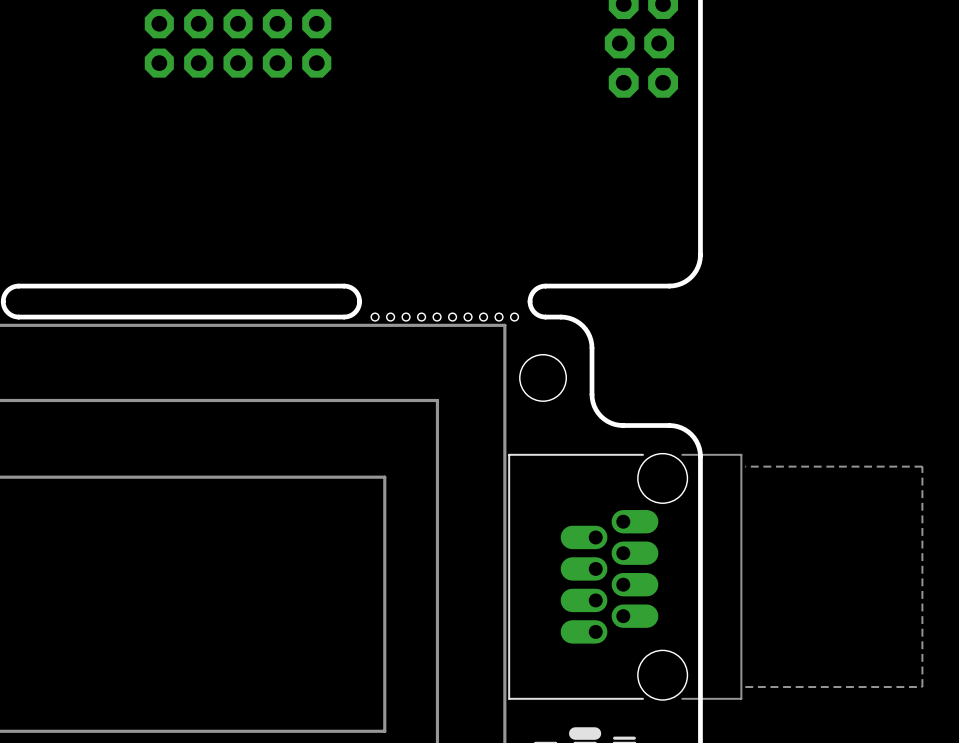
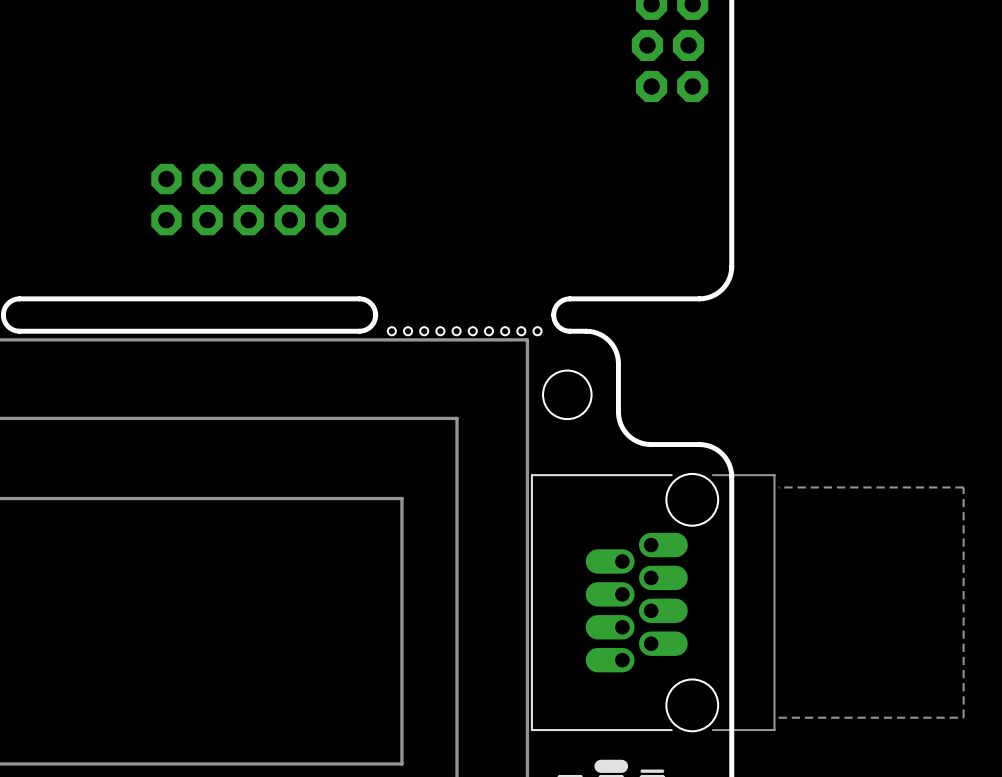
part position: (238, 43) -> (248, 199)

